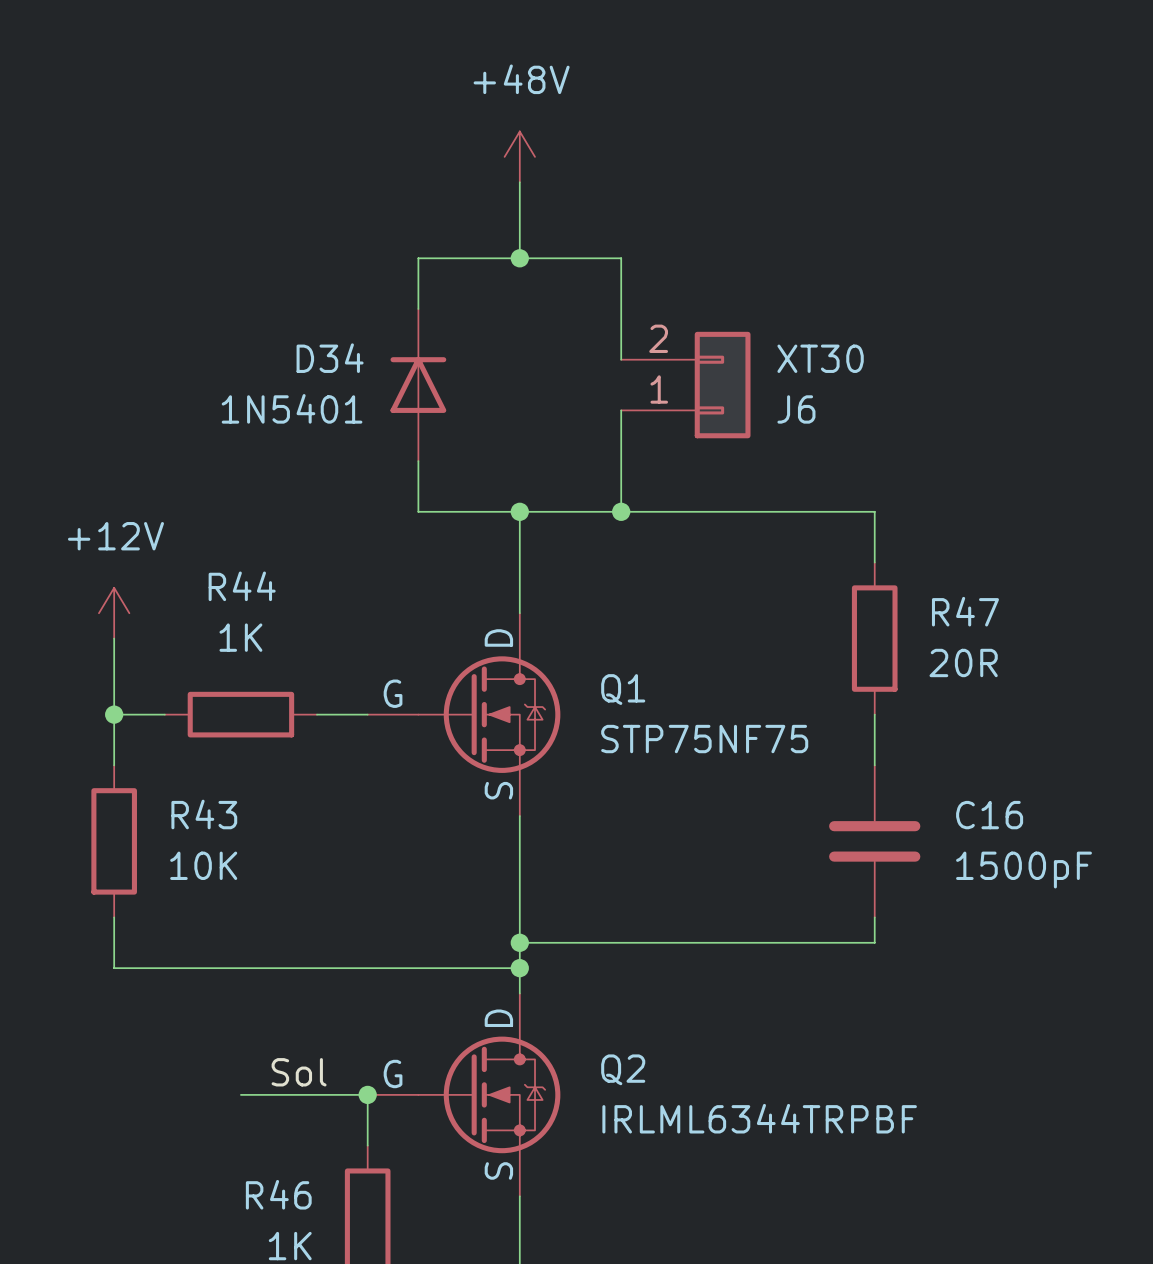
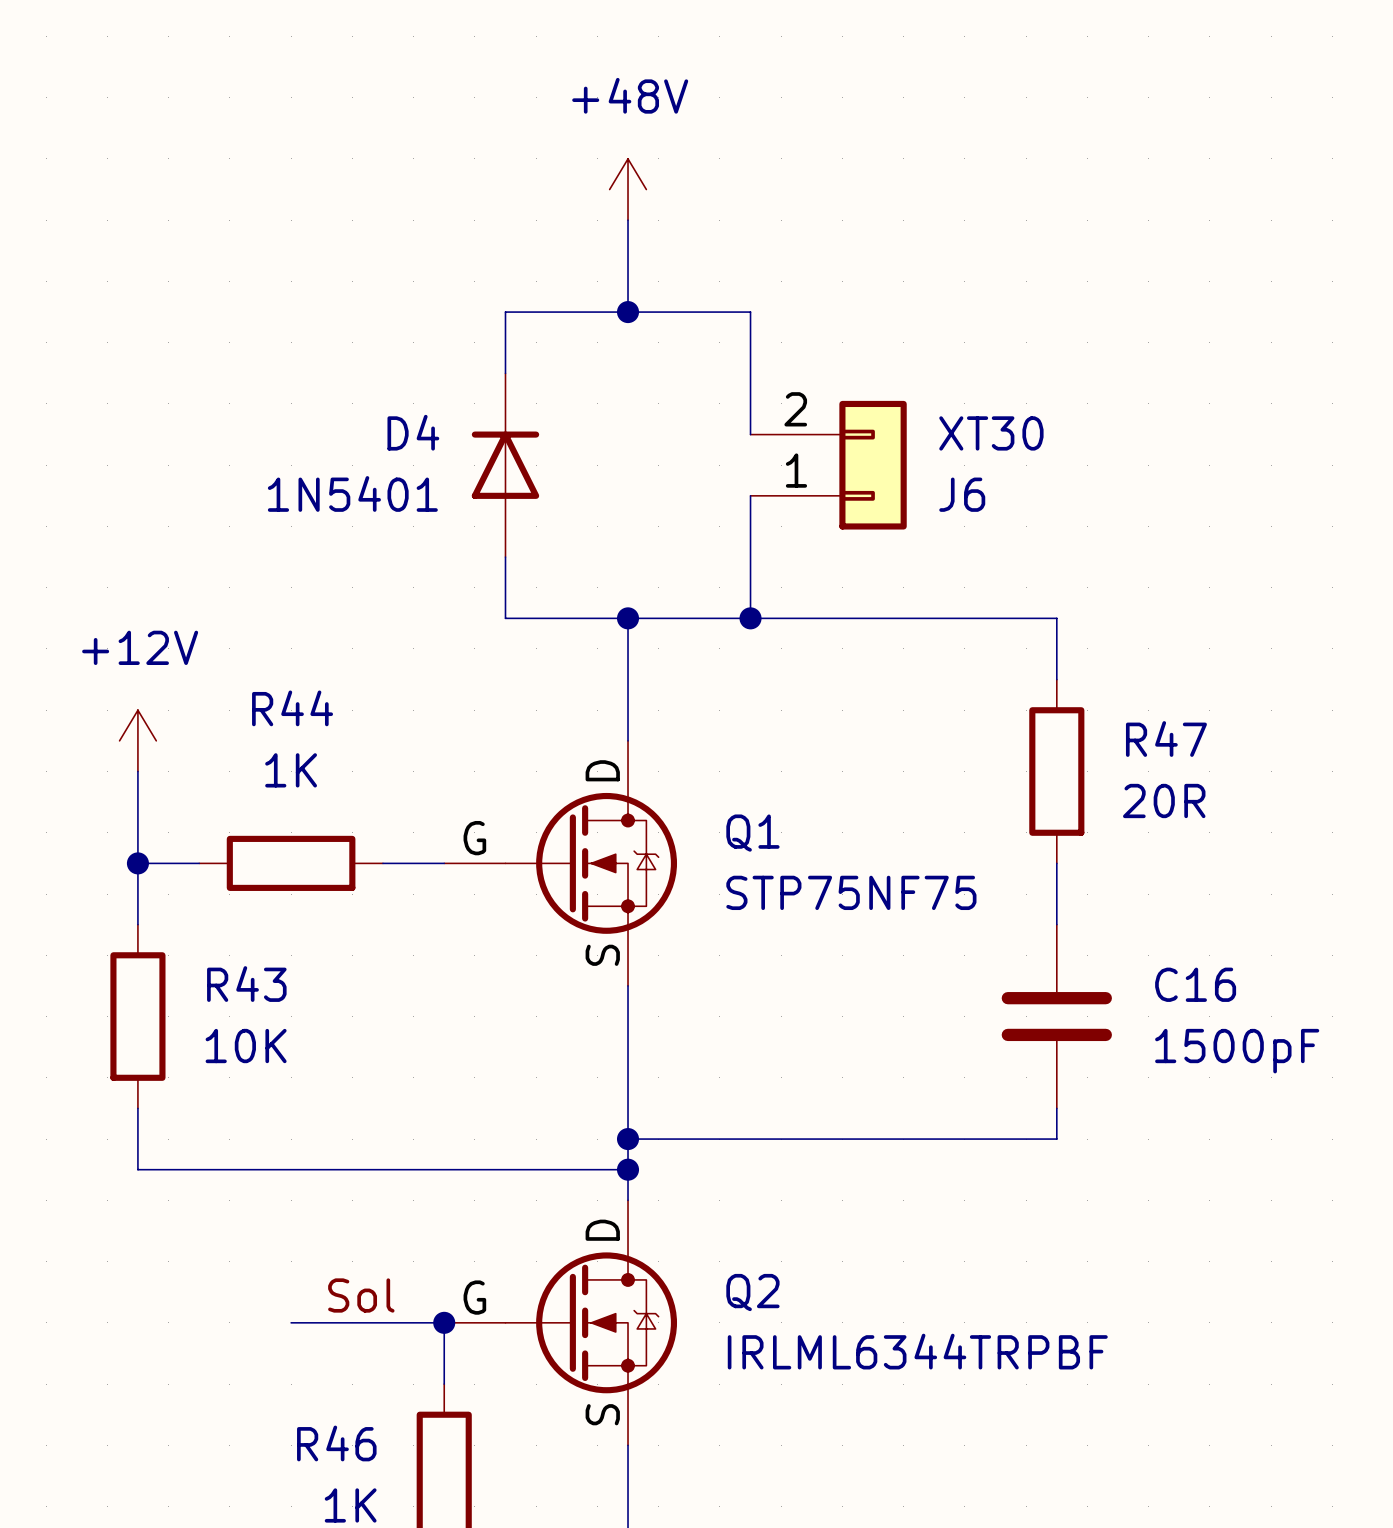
D34 name: D34 (330, 358) -> D4 (413, 432)

